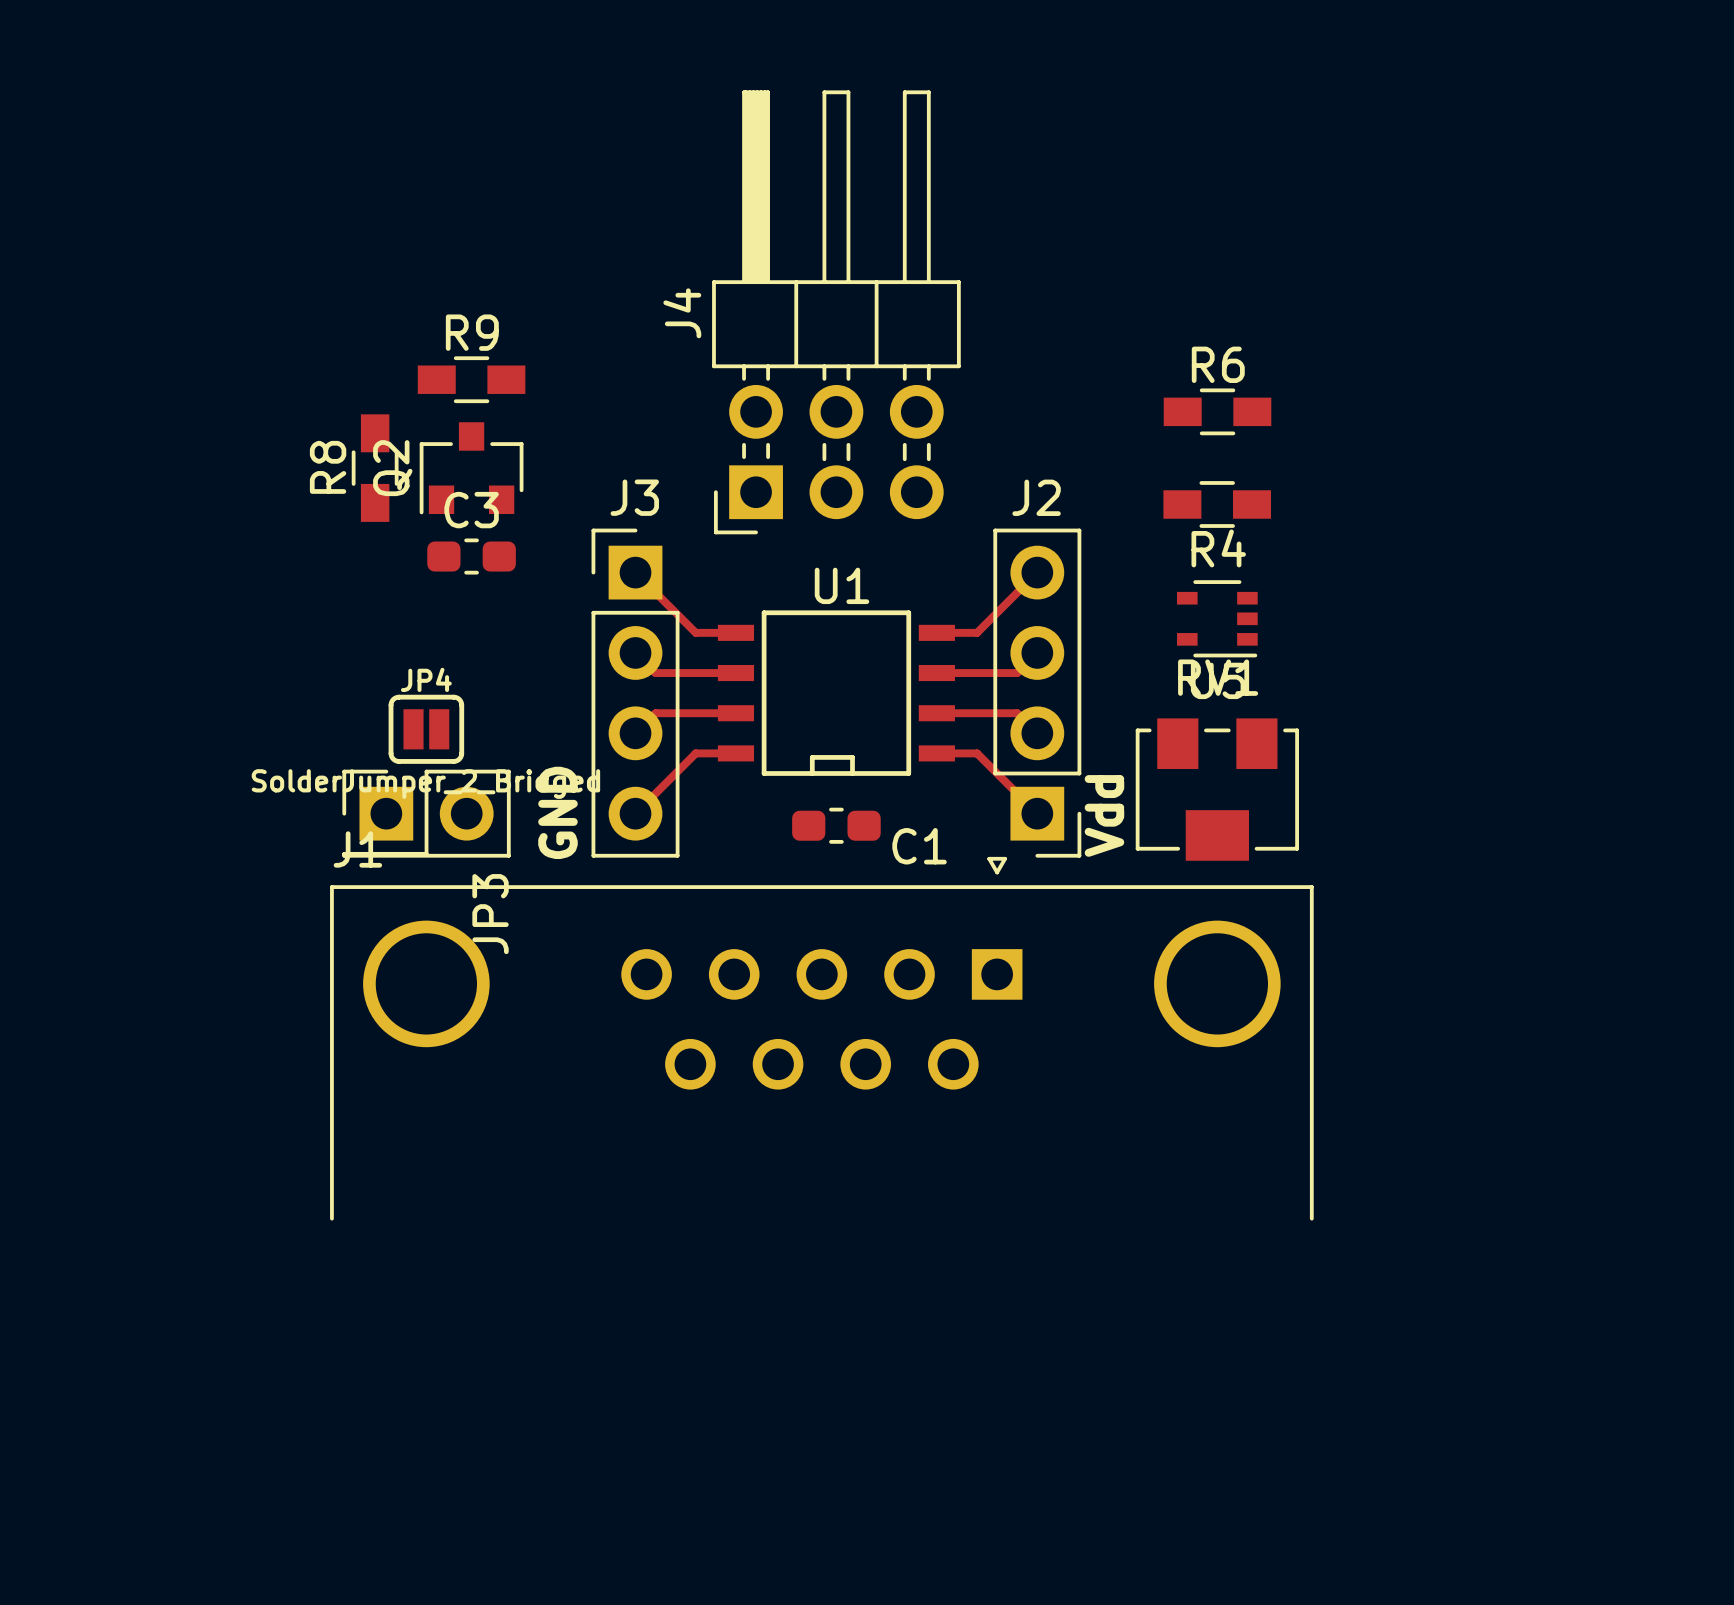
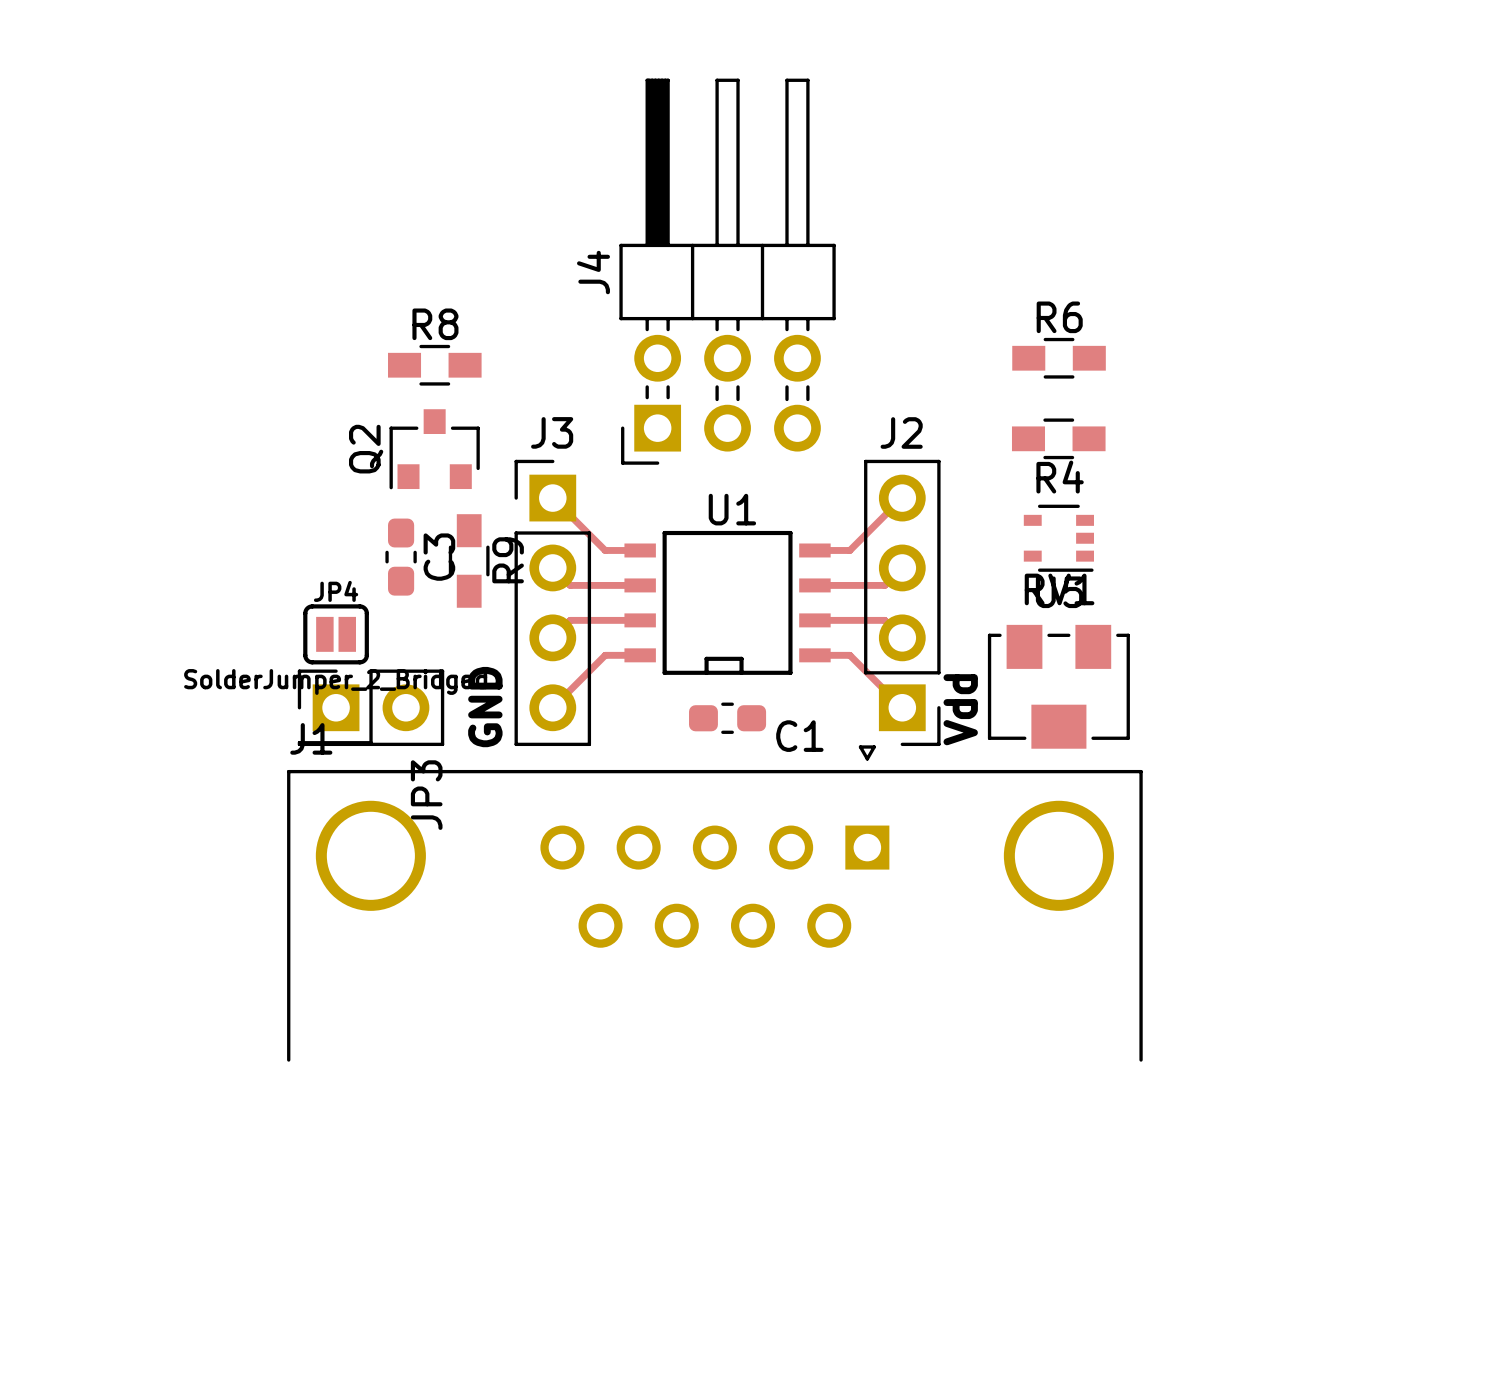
R9 rotation: 0° (471, 379) -> 90° clockwise (469, 560)
R9 position: (471, 379) -> (469, 560)
R8 rotation: 0° (375, 468) -> 90° clockwise (434, 365)
R8 position: (375, 468) -> (434, 365)
Q2 position: (471, 468) -> (434, 449)
C3 rotation: 0° (471, 556) -> 90° clockwise (401, 557)
C3 position: (471, 556) -> (401, 557)
JP4 position: (426, 729) -> (336, 634)

